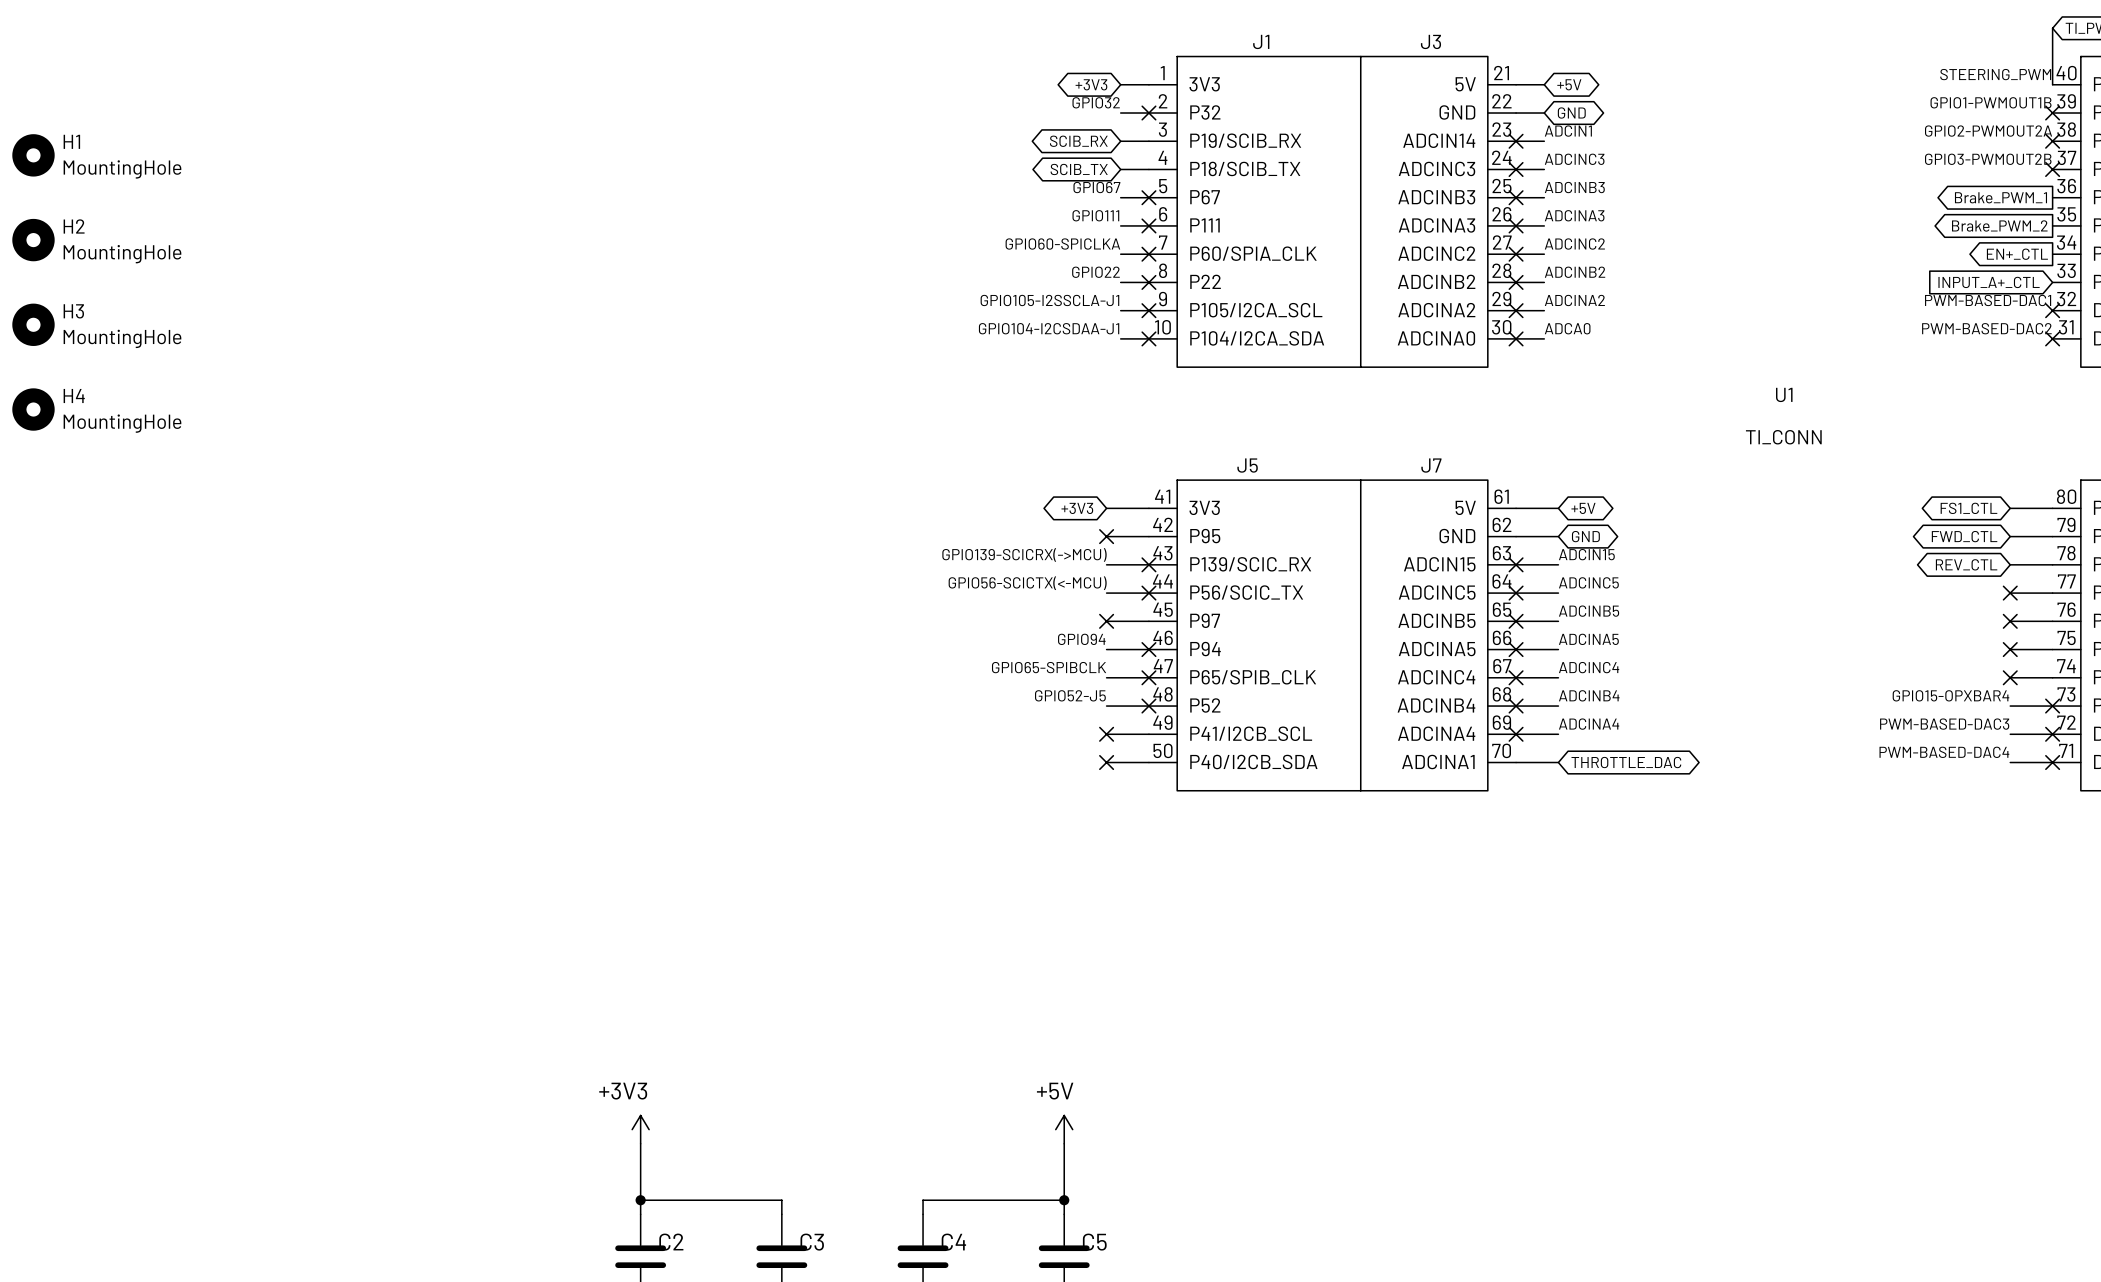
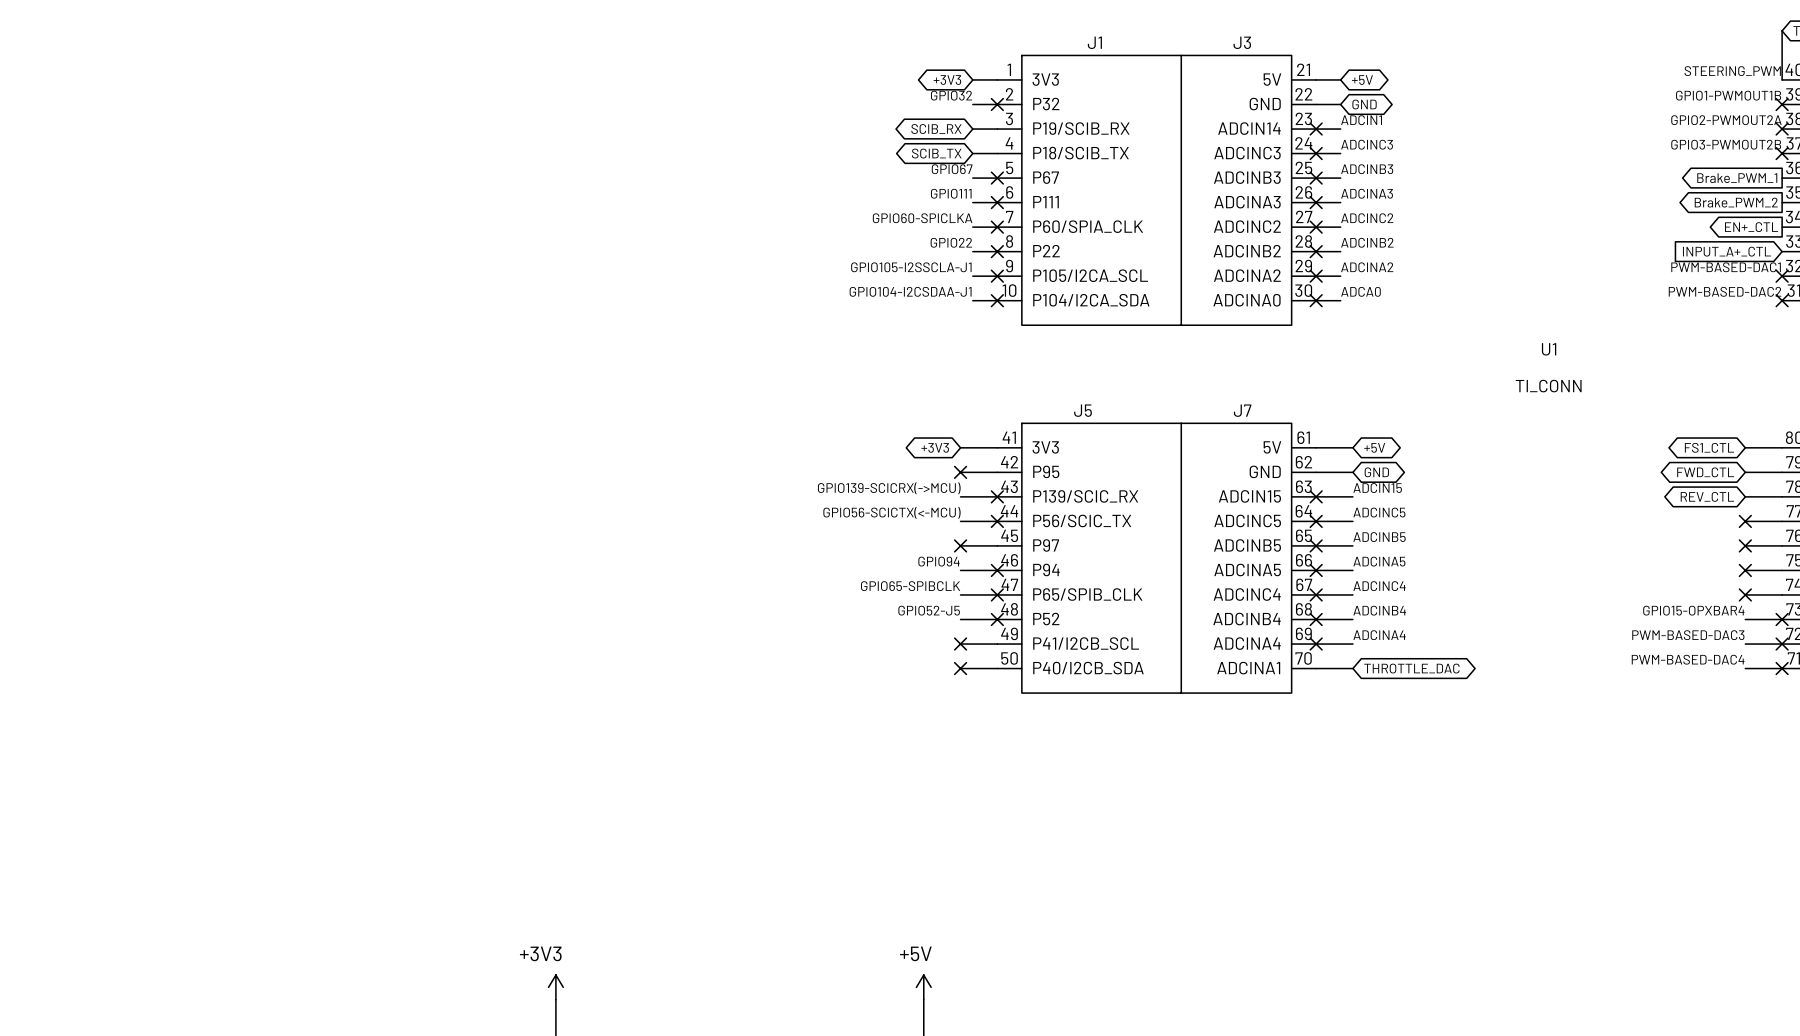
H1: MountingHole (33, 155) -> none
H2: MountingHole (33, 240) -> none
H3: MountingHole (33, 324) -> none
H4: MountingHole (33, 409) -> none

